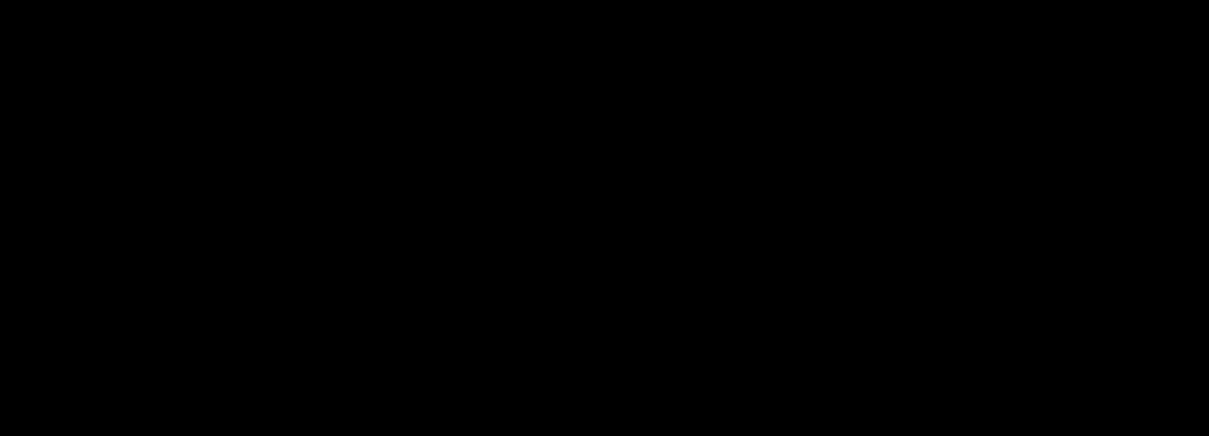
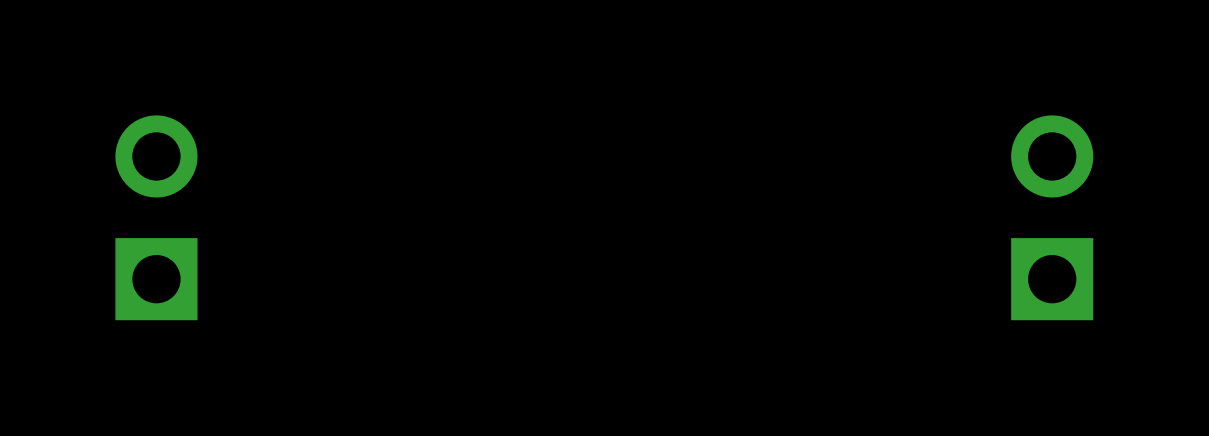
part: none -> (156, 217)
part: none -> (1052, 217)

